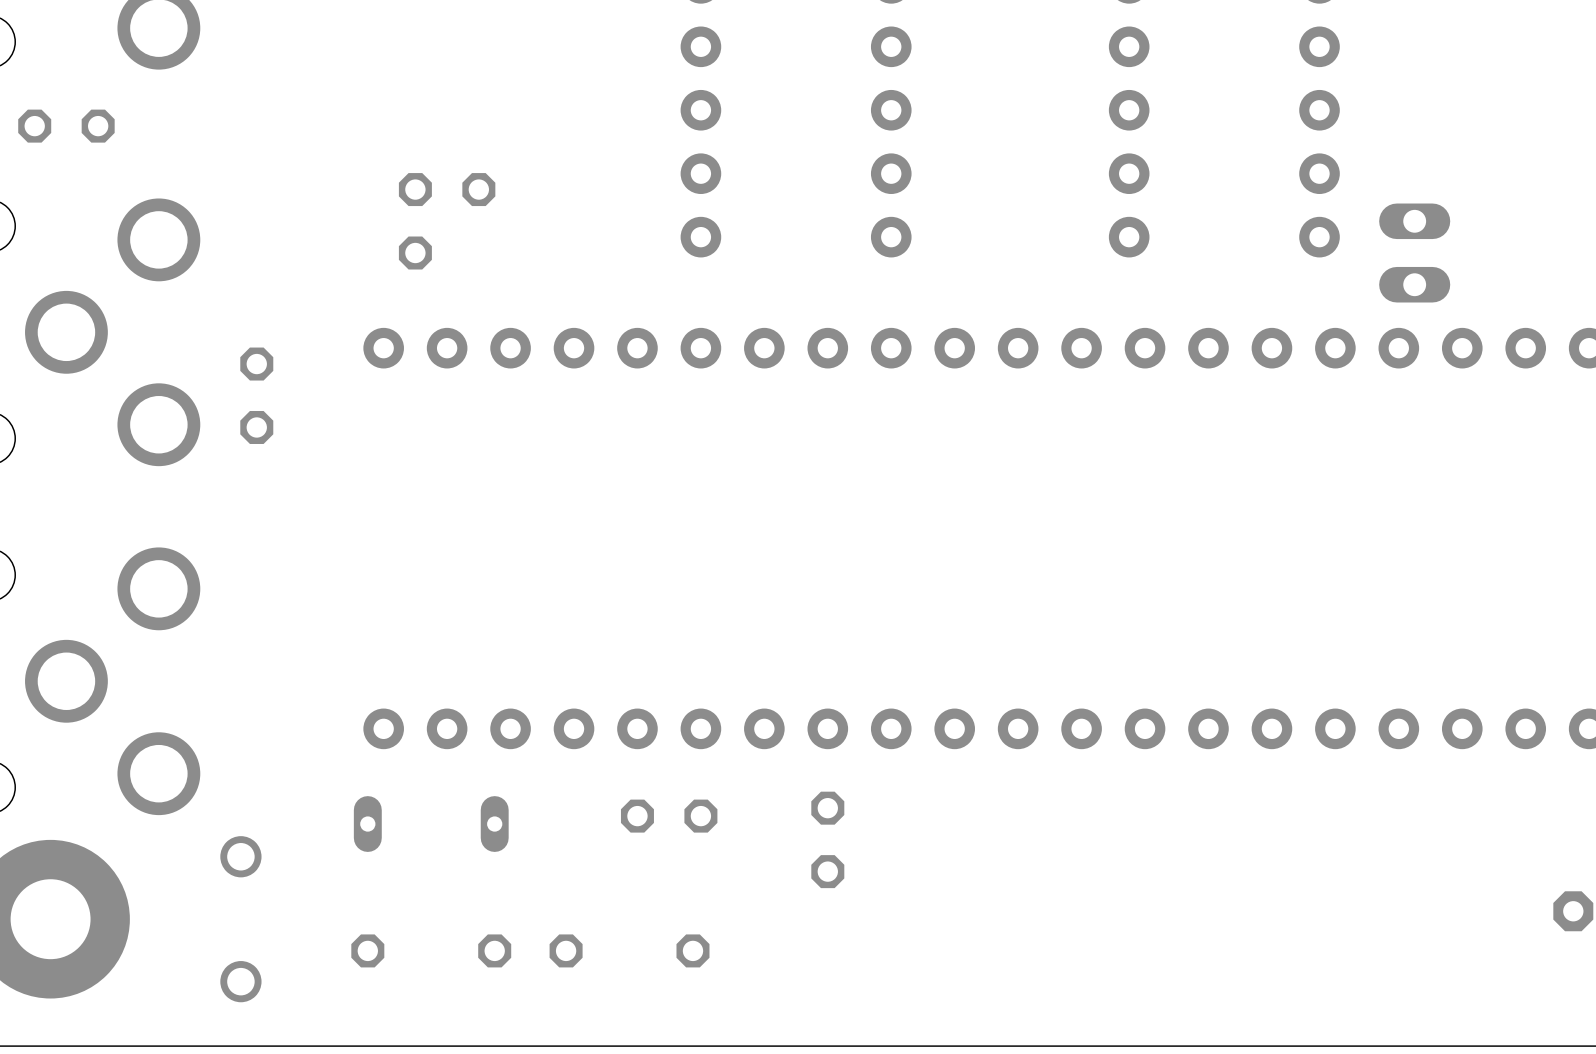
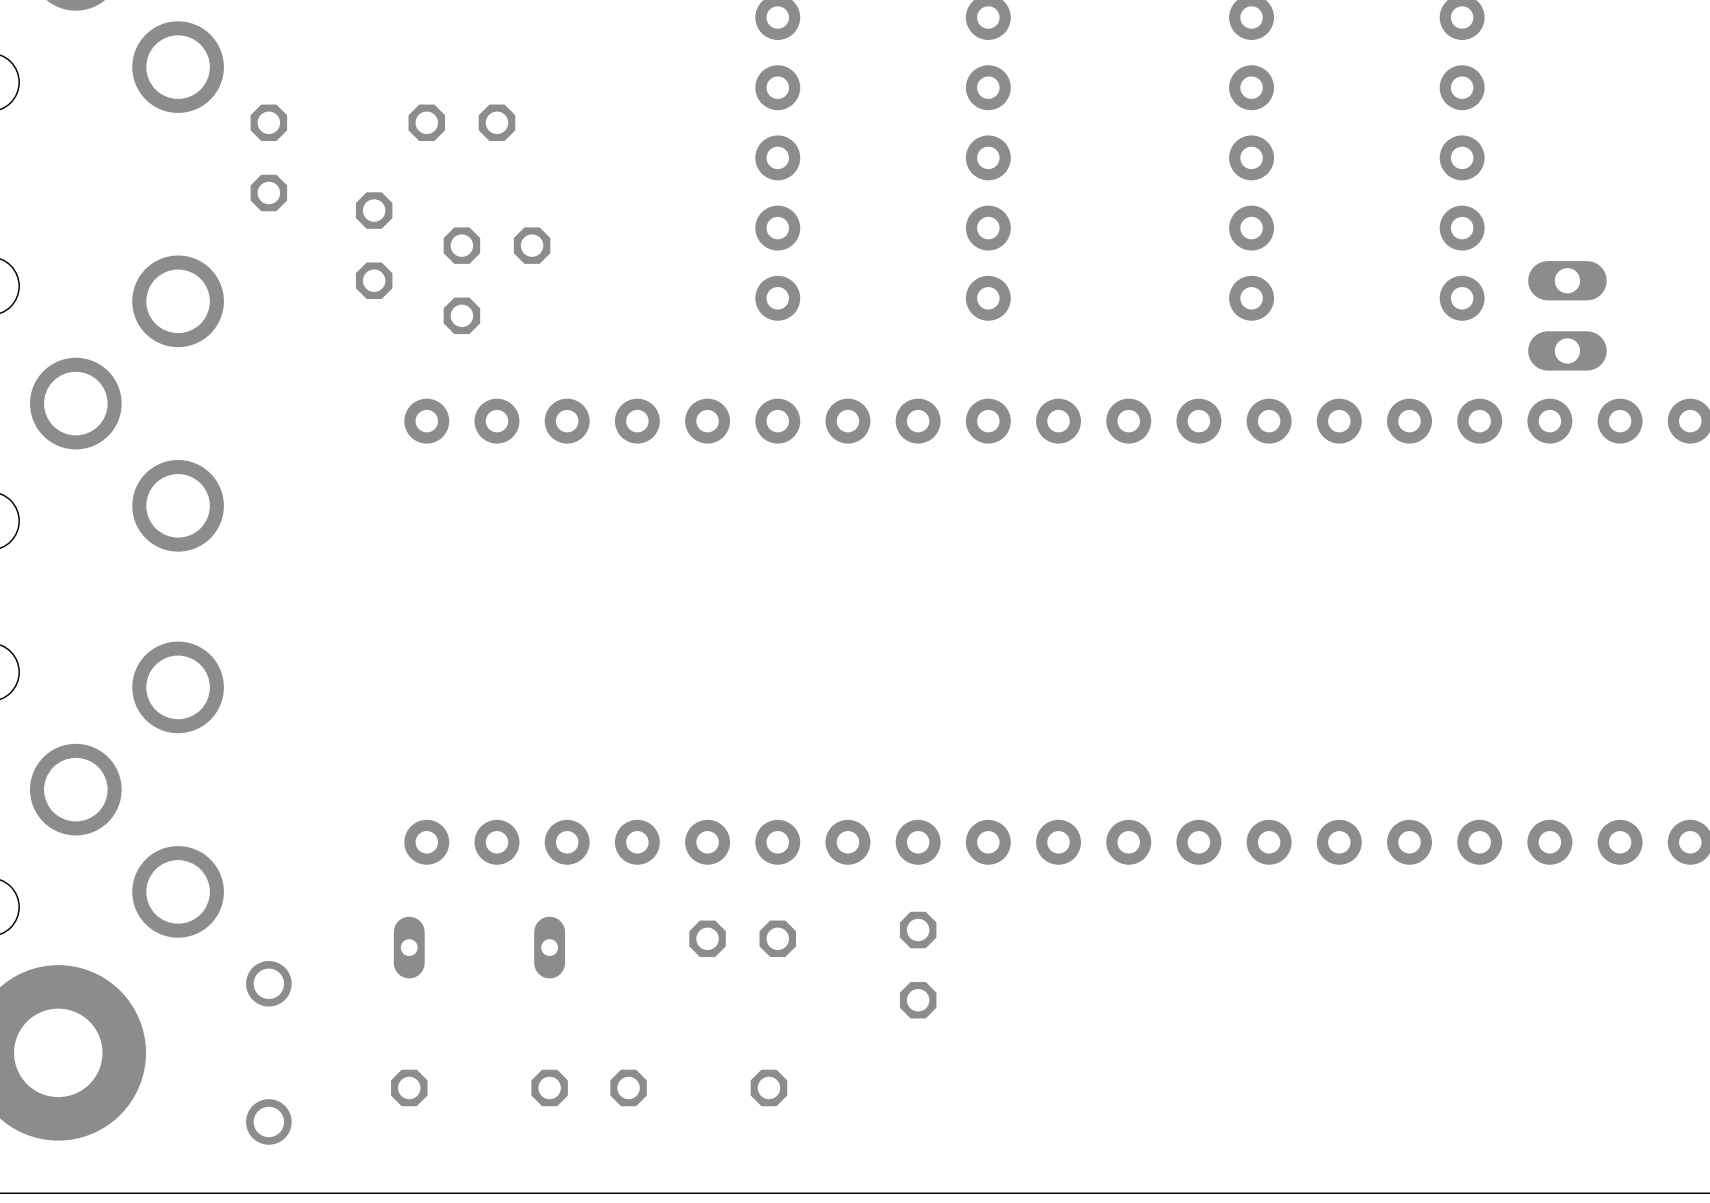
part: none -> (461, 122)
part: none -> (268, 157)
part: (66, 126) -> none
part: none -> (374, 245)
part: (256, 395) -> none

